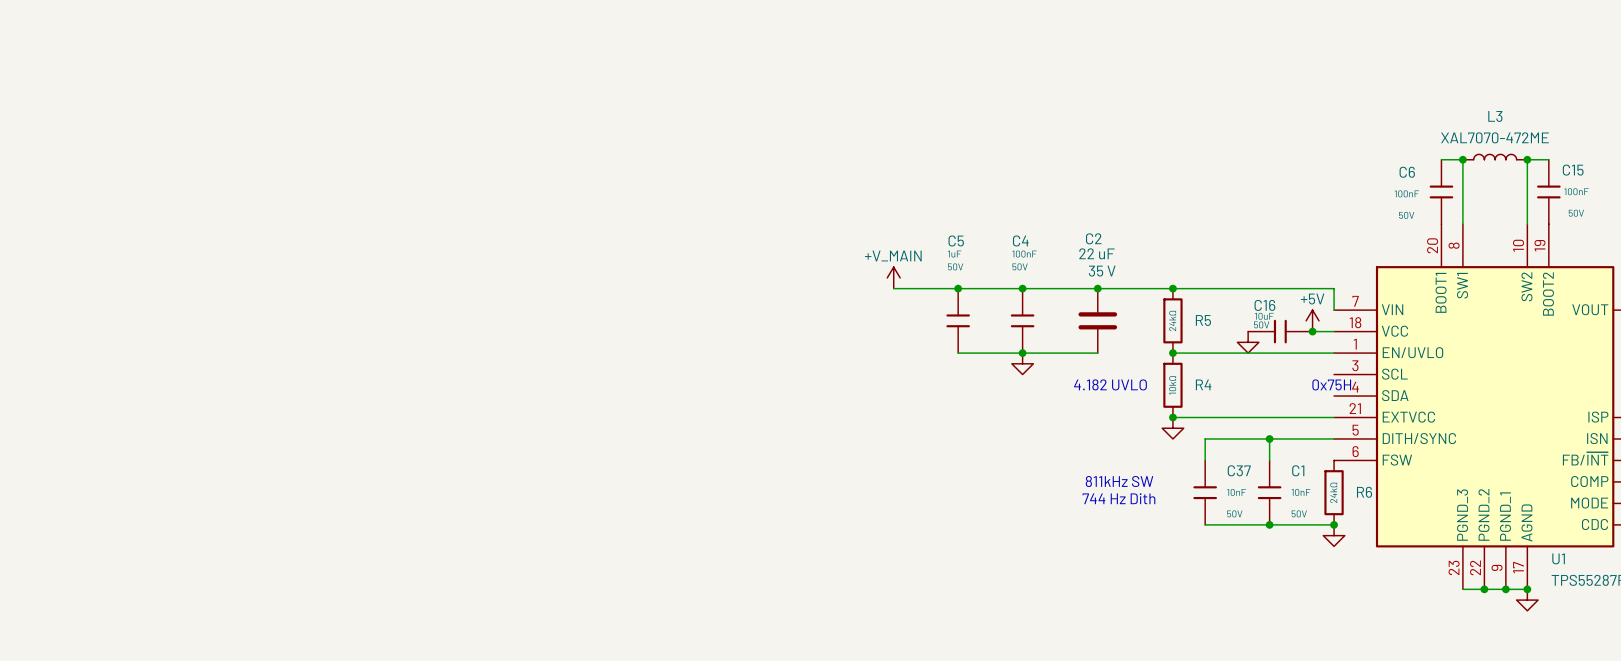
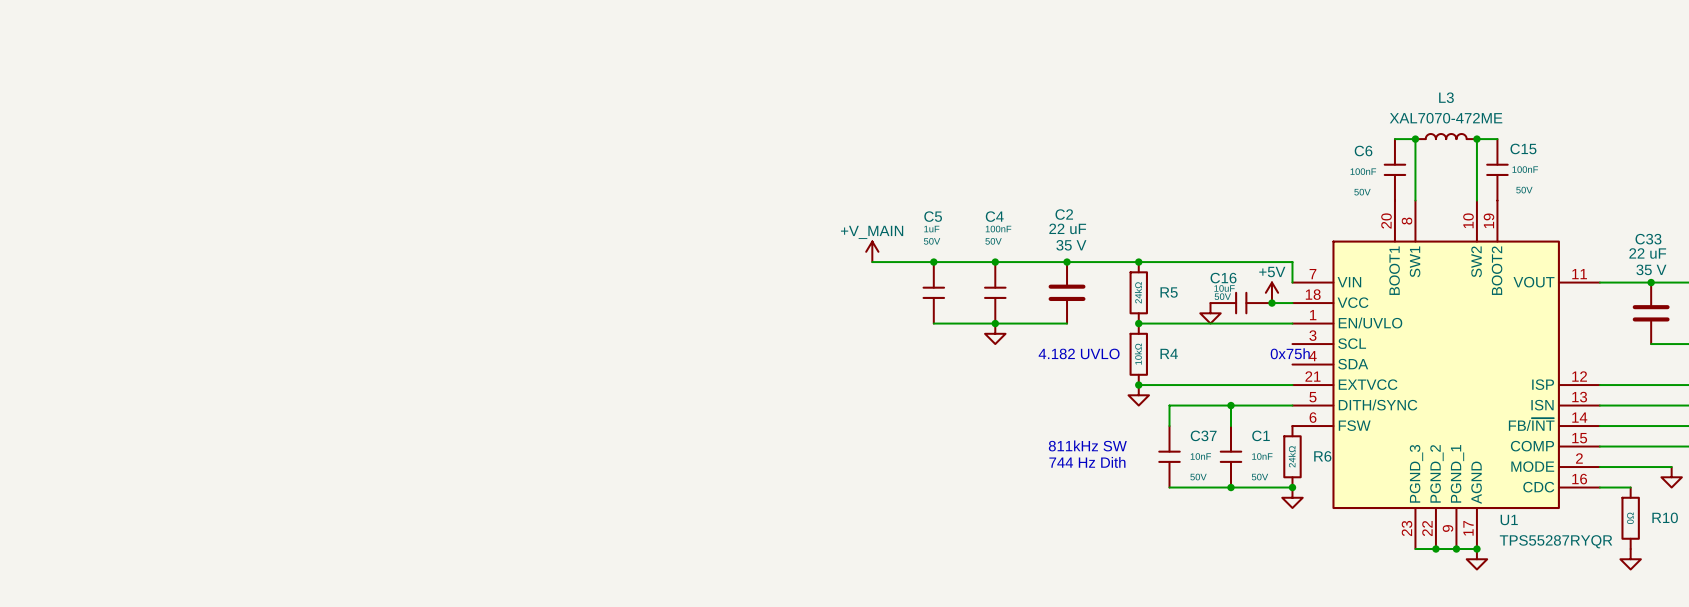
text: 0x75H (1331, 384) -> 0x75h (1290, 353)

